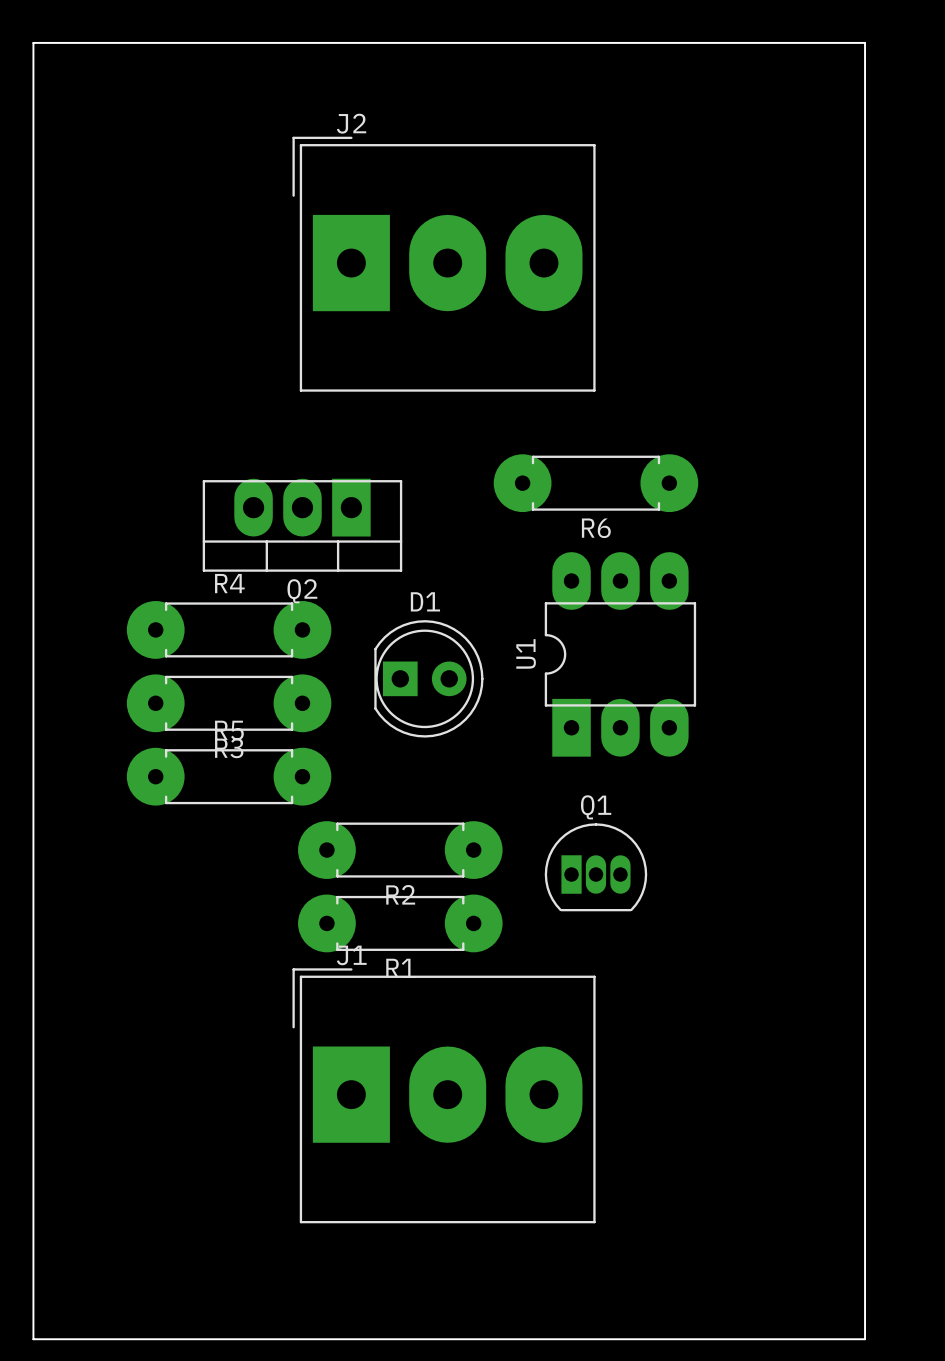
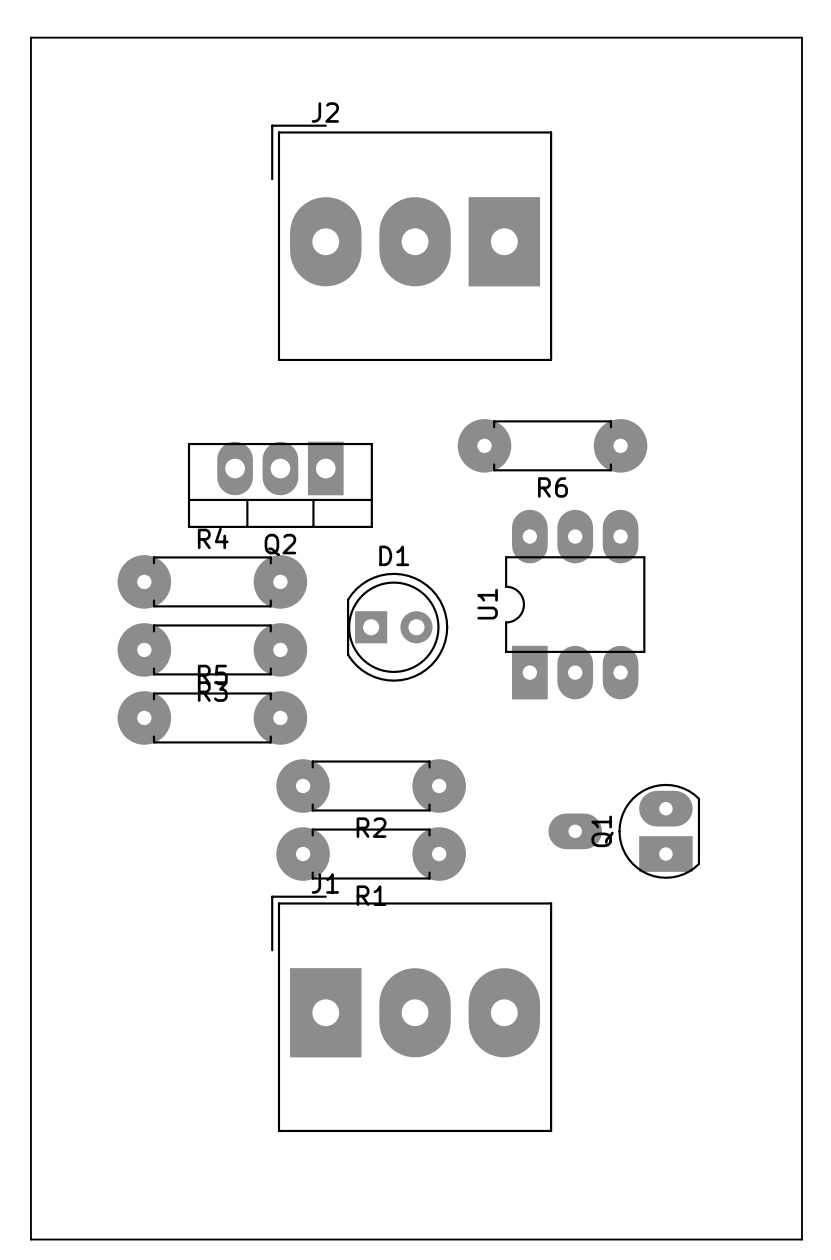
J2 footprint: [292, 136, 596, 392] -> [271, 124, 553, 362]
Q1 name position: Q1 (596, 807) -> Q1 (602, 831)
Q1 footprint: [544, 823, 648, 912] -> [548, 783, 701, 879]

